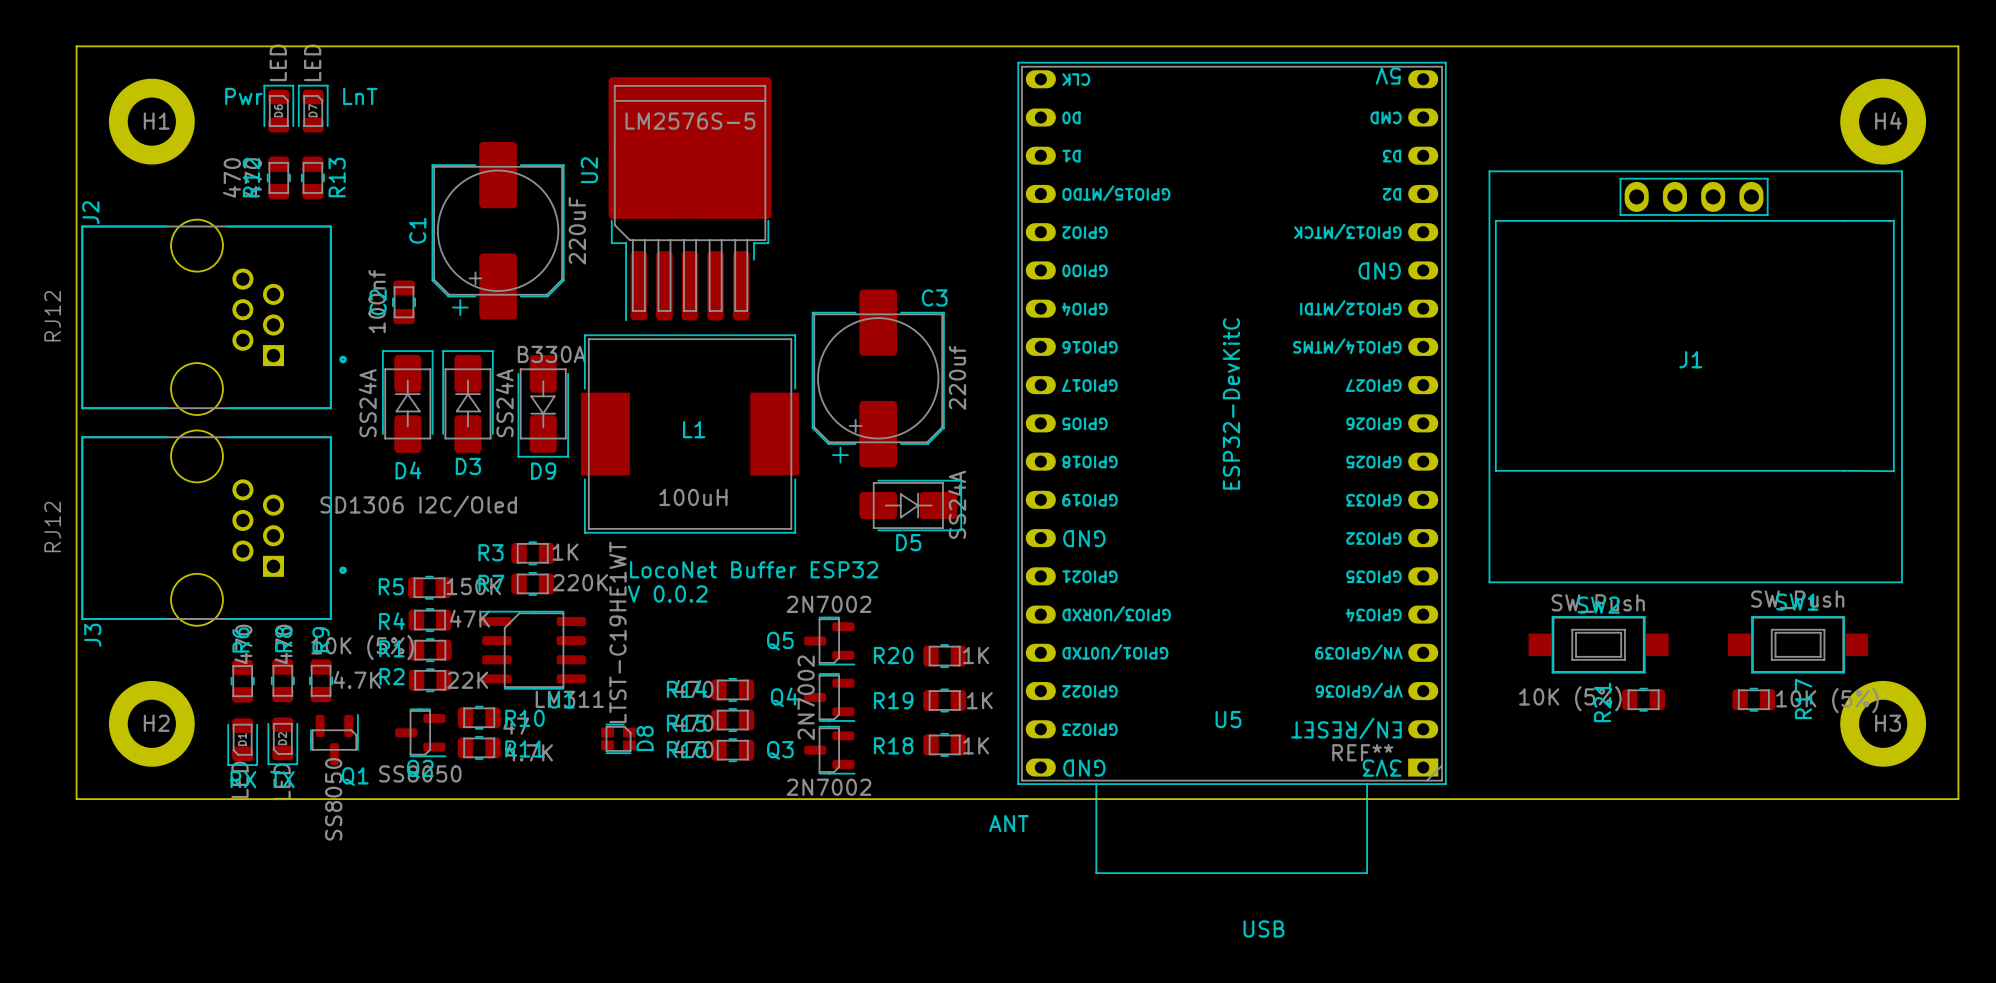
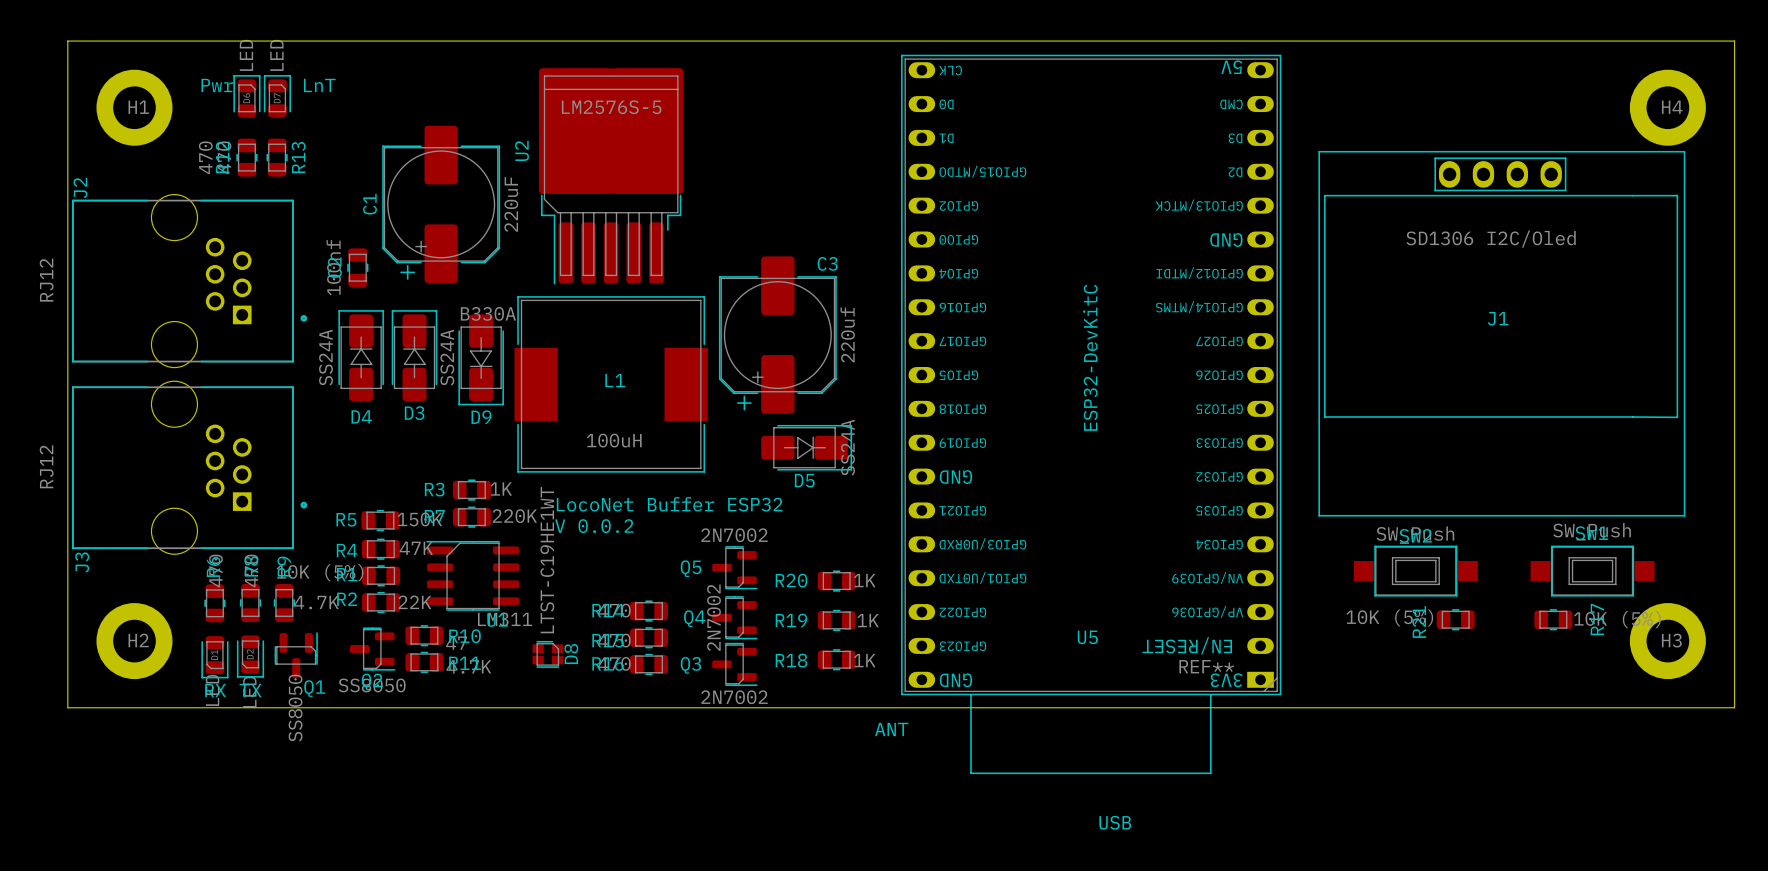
J1 value position: SD1306 I2C/Oled (418, 506) -> SD1306 I2C/Oled (1491, 239)

